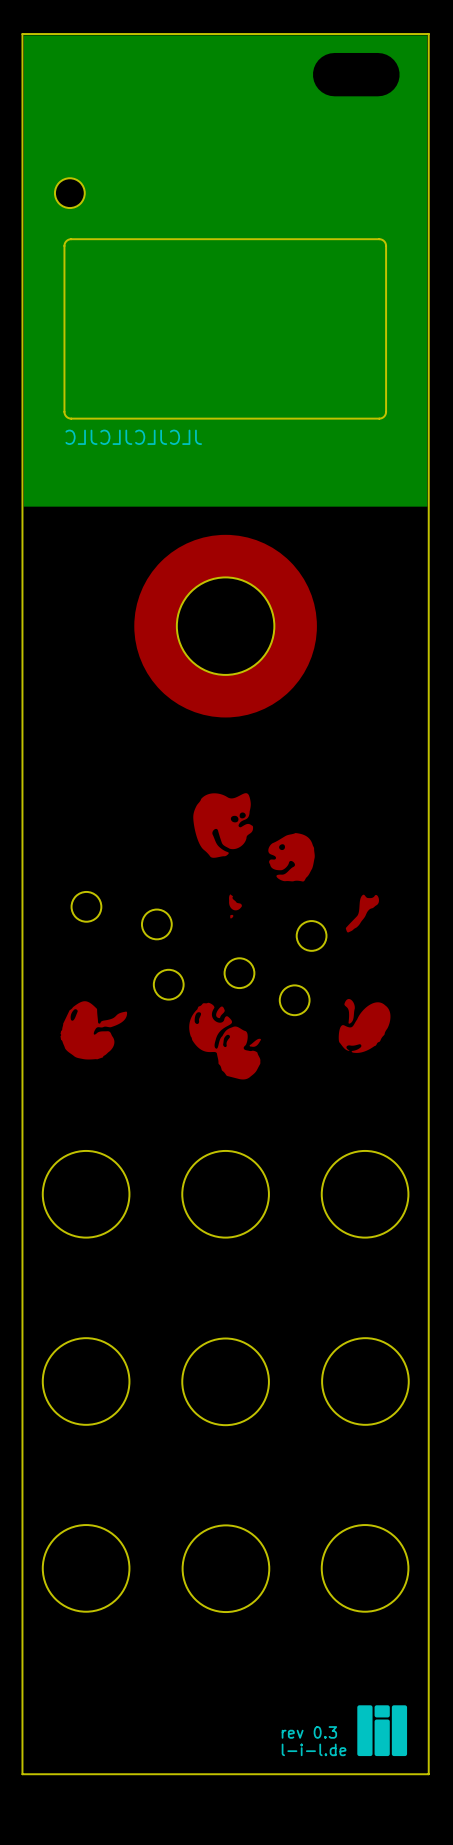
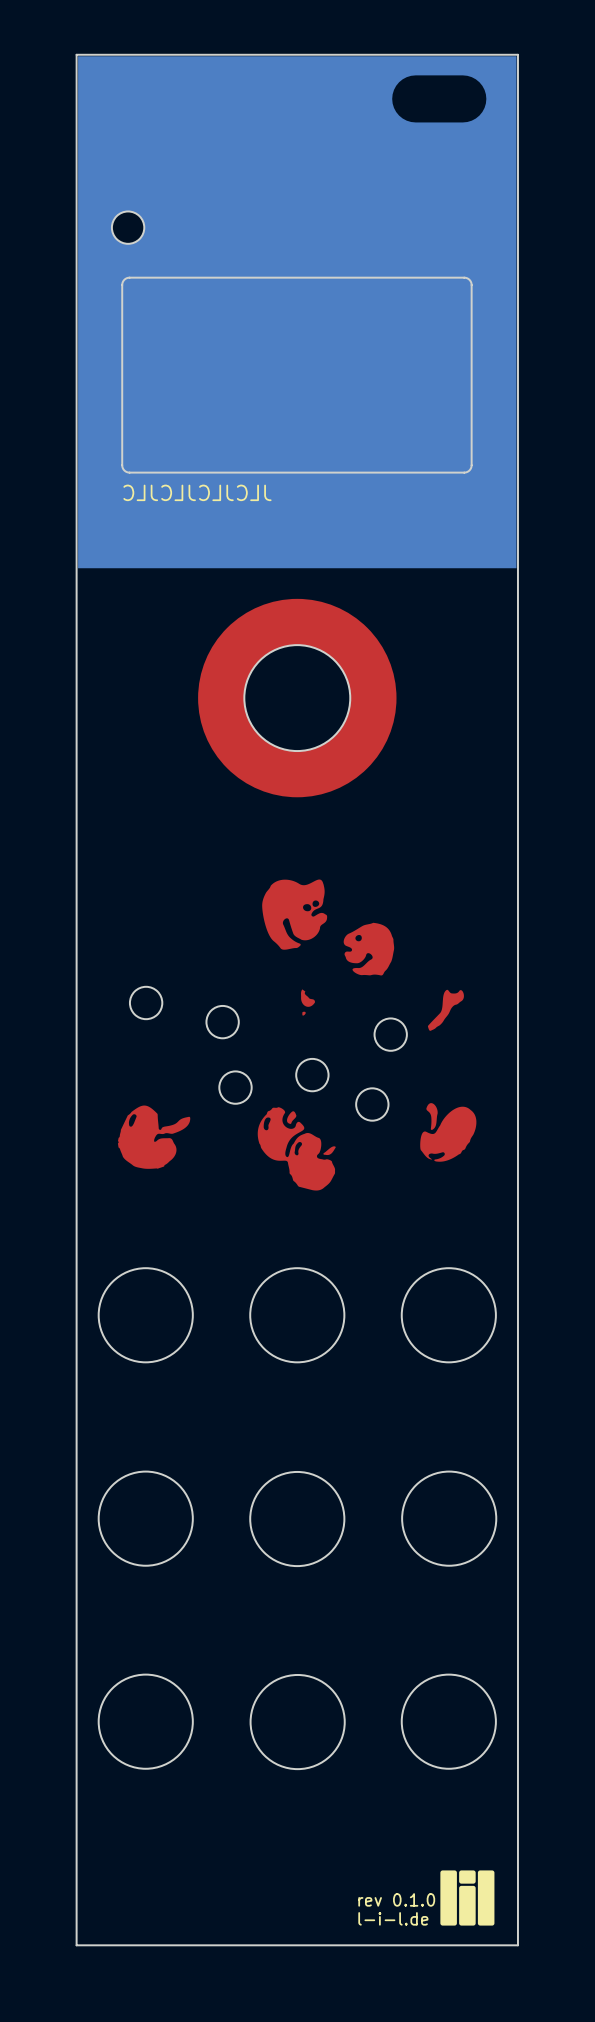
text: rev 0.3 (309, 1732) -> rev 0.1.0 (396, 1899)

